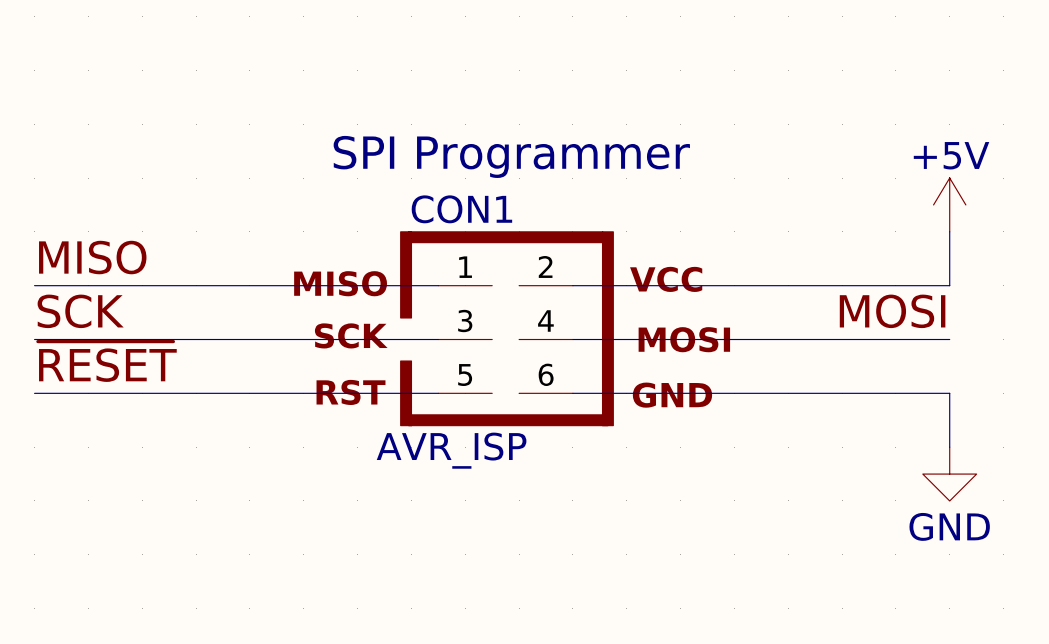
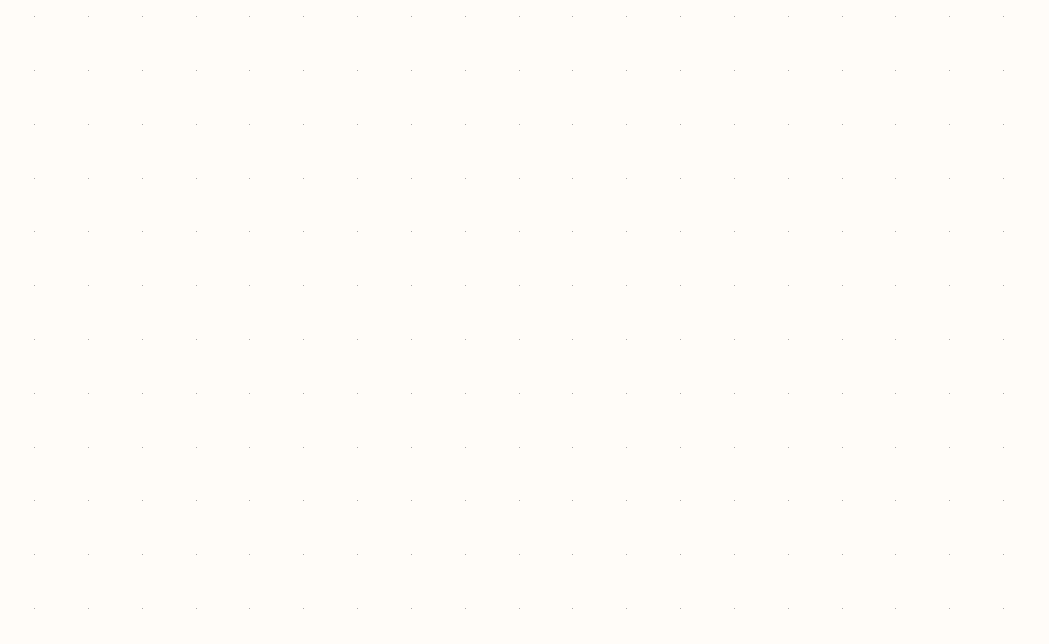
text: SPI Programmer (511, 156) -> none
power symbol: +5V (949, 204) -> none
wire: (949, 231) (949, 285) (572, 285) -> none
label: MISO (92, 257) -> none
wire: (34, 285) (438, 285) -> none
label: SCK (80, 311) -> none
label: MOSI (892, 311) -> none
CON1: AVR_ISP (507, 328) -> none
wire: (34, 339) (438, 339) -> none
wire: (572, 339) (949, 339) -> none
label: ~{RESET} (107, 361) -> none
wire: (34, 393) (438, 393) -> none
wire: (572, 393) (949, 393) (949, 447) -> none
power symbol: GND (949, 474) -> none

